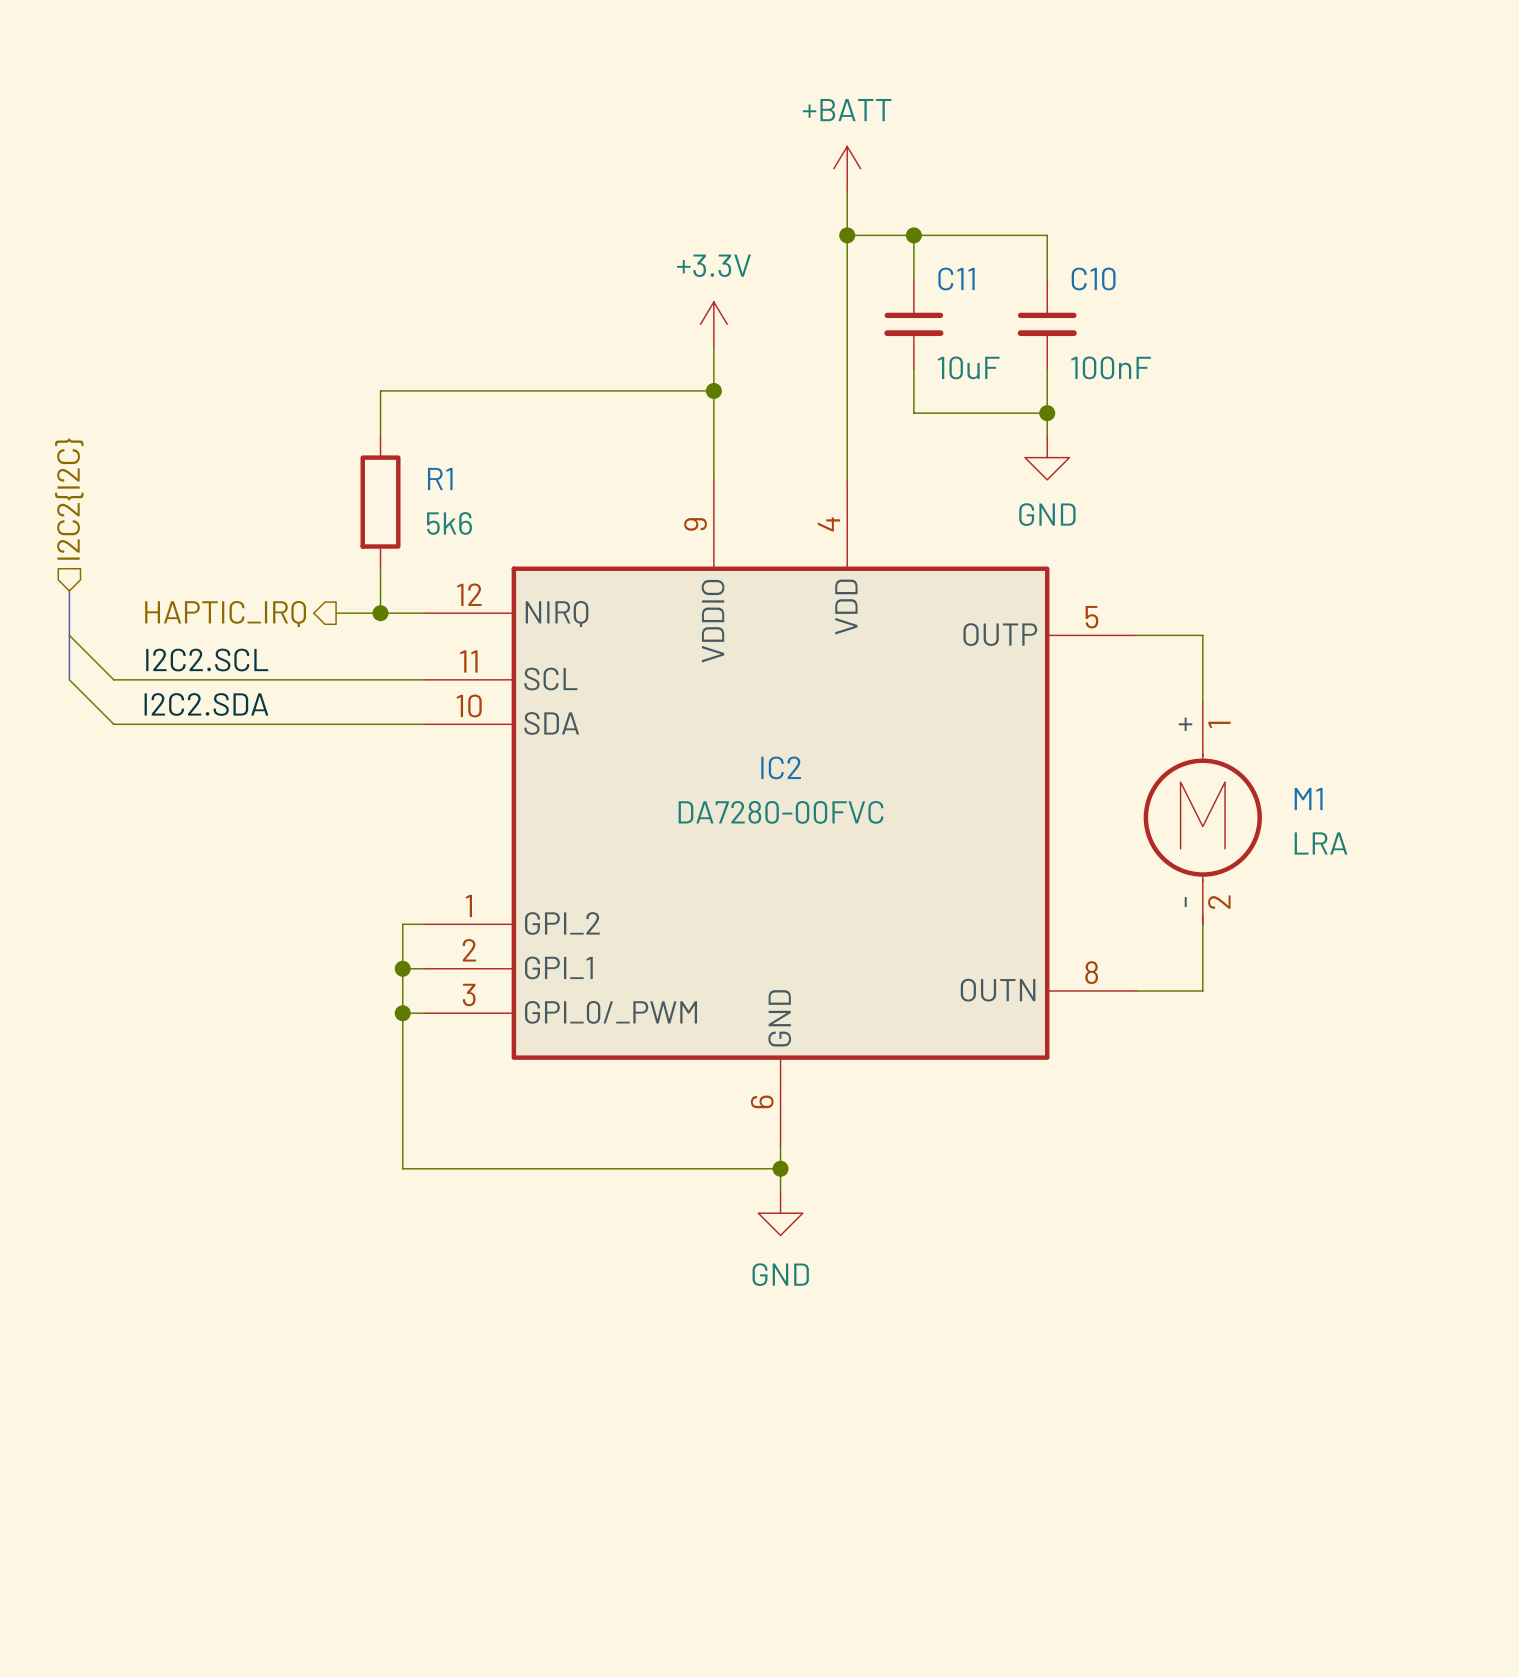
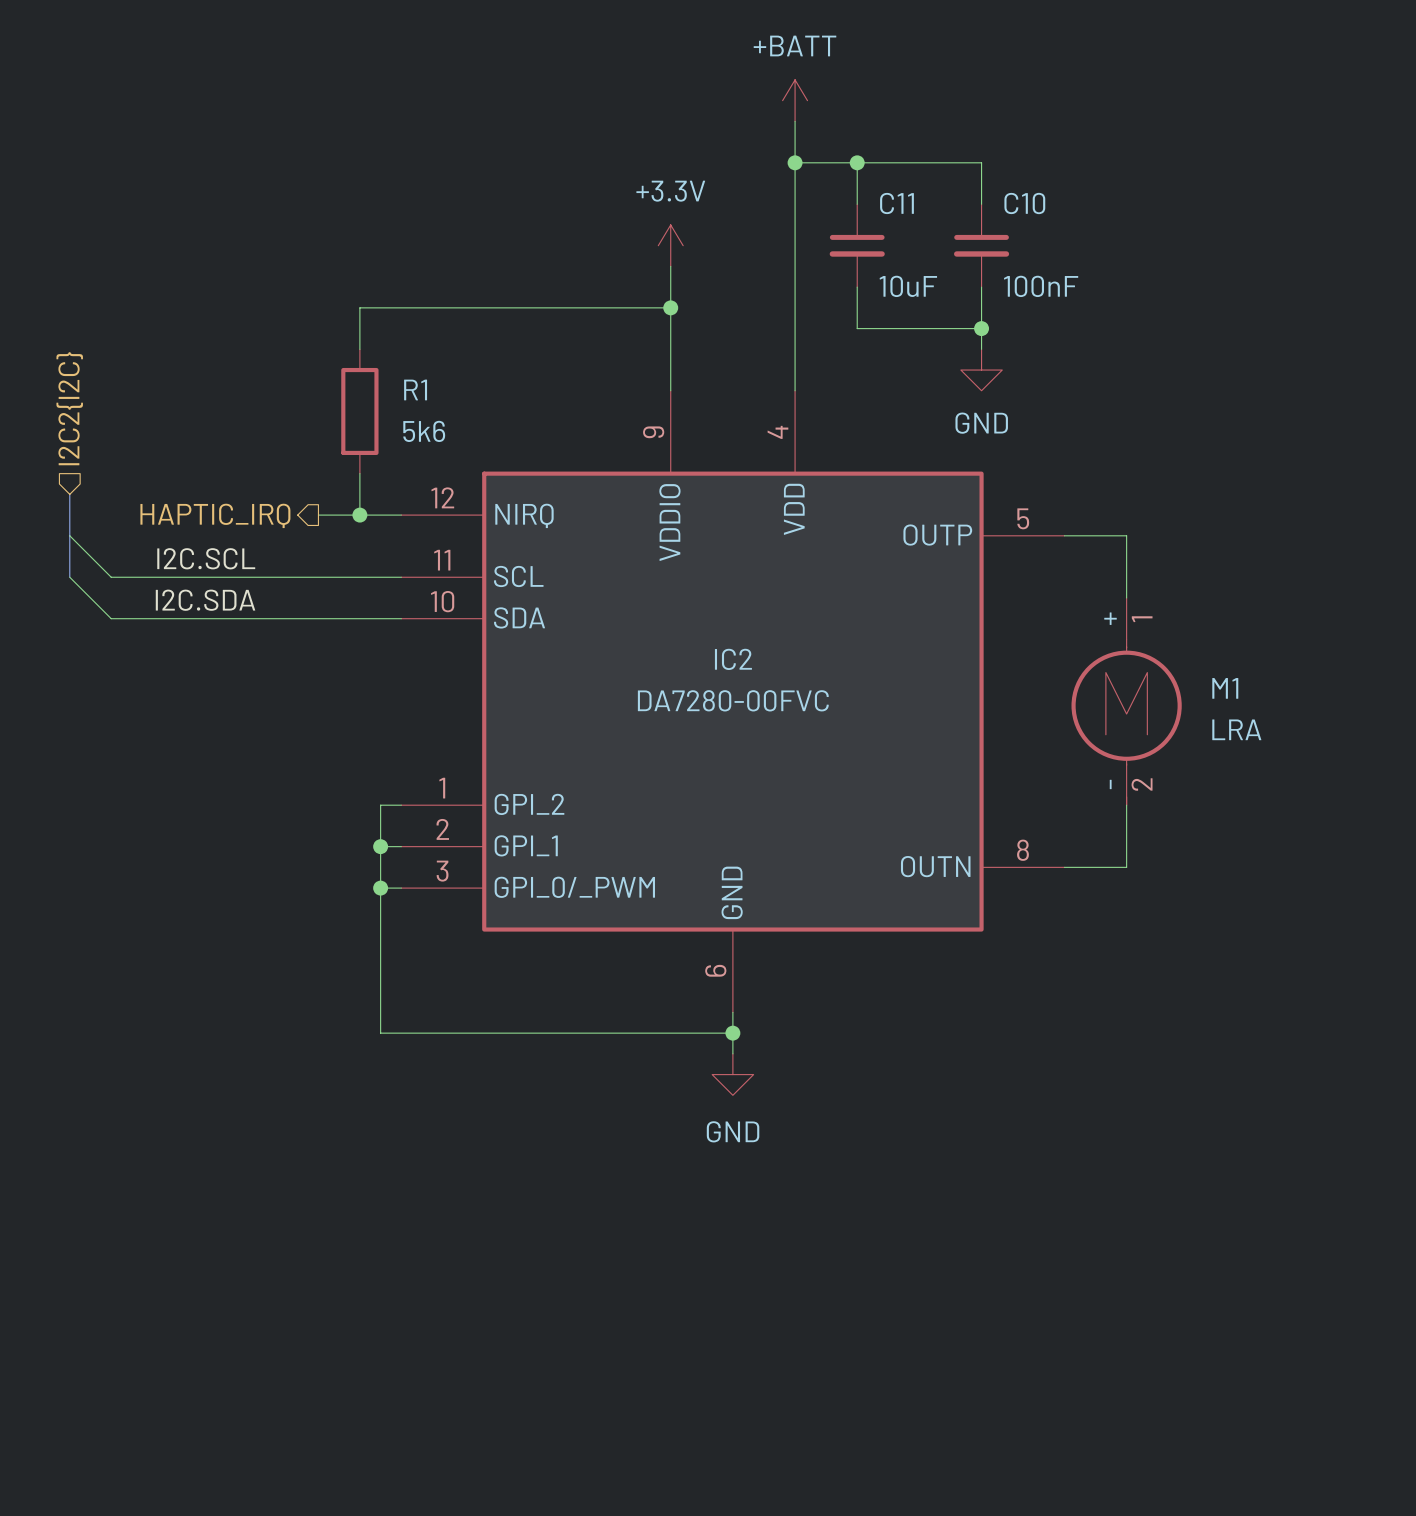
label: I2C2.SCL (207, 660) -> I2C.SCL (206, 558)
label: I2C2.SDA (206, 704) -> I2C.SDA (205, 600)

